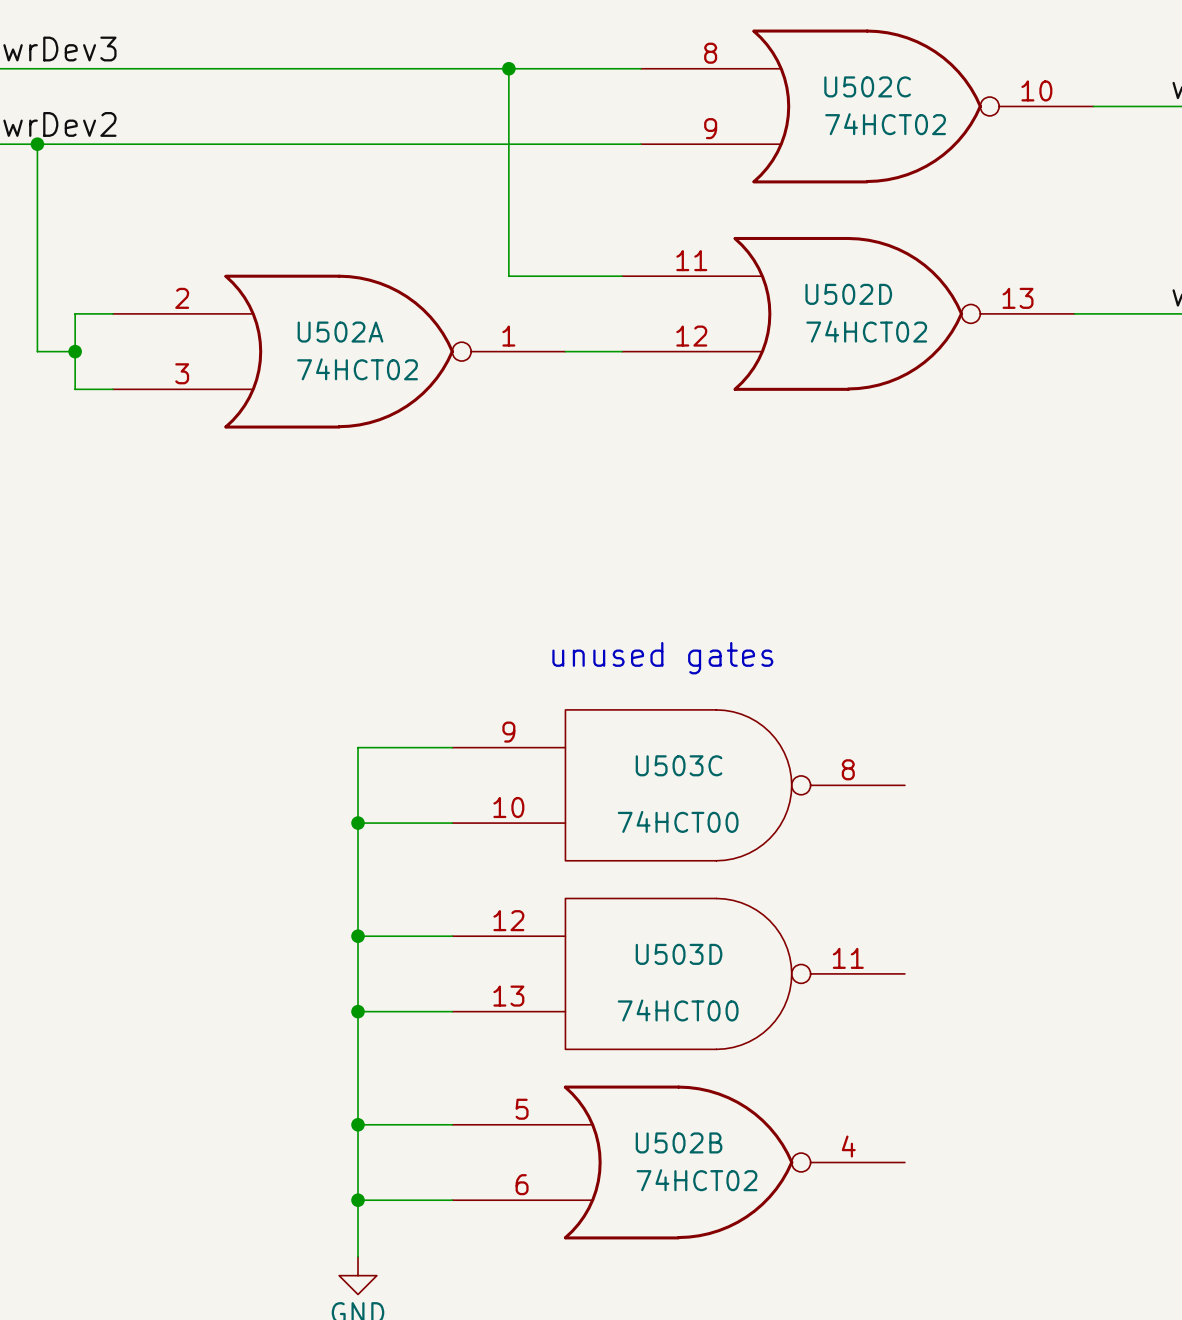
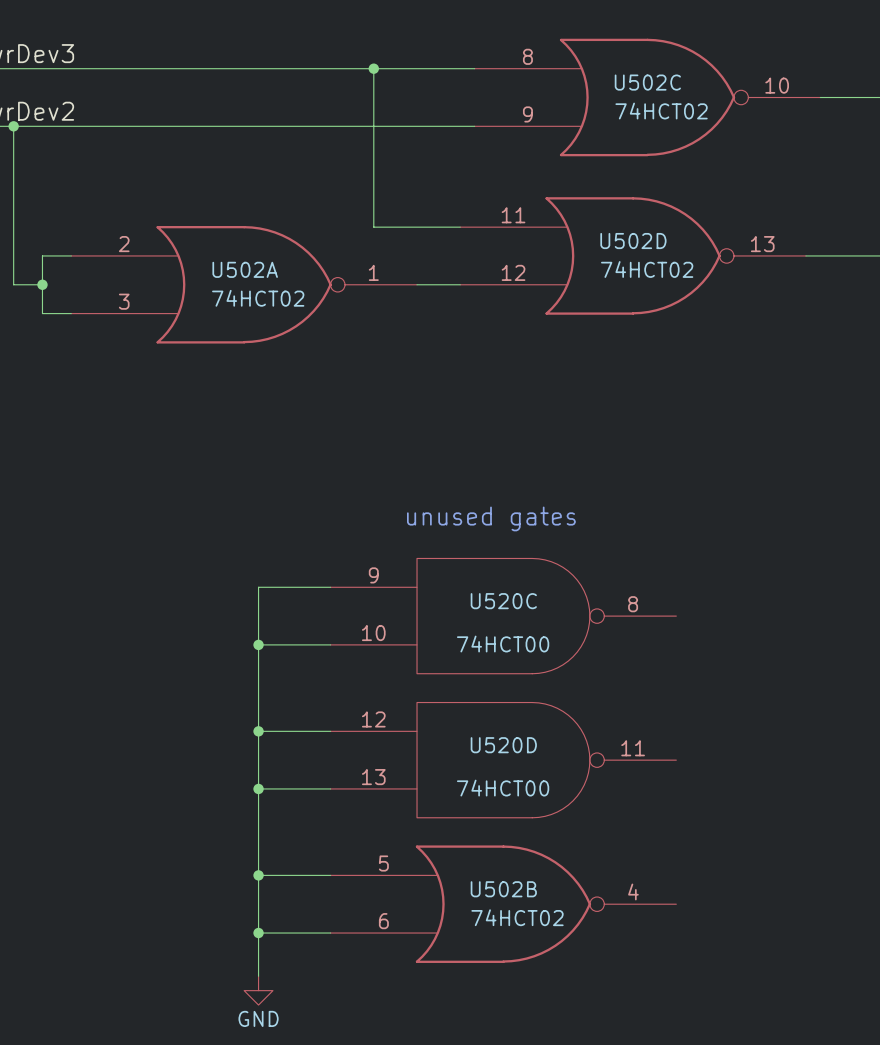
U503C name: U503C (679, 765) -> U520C (503, 601)
U503D name: U503D (679, 954) -> U520D (503, 745)

